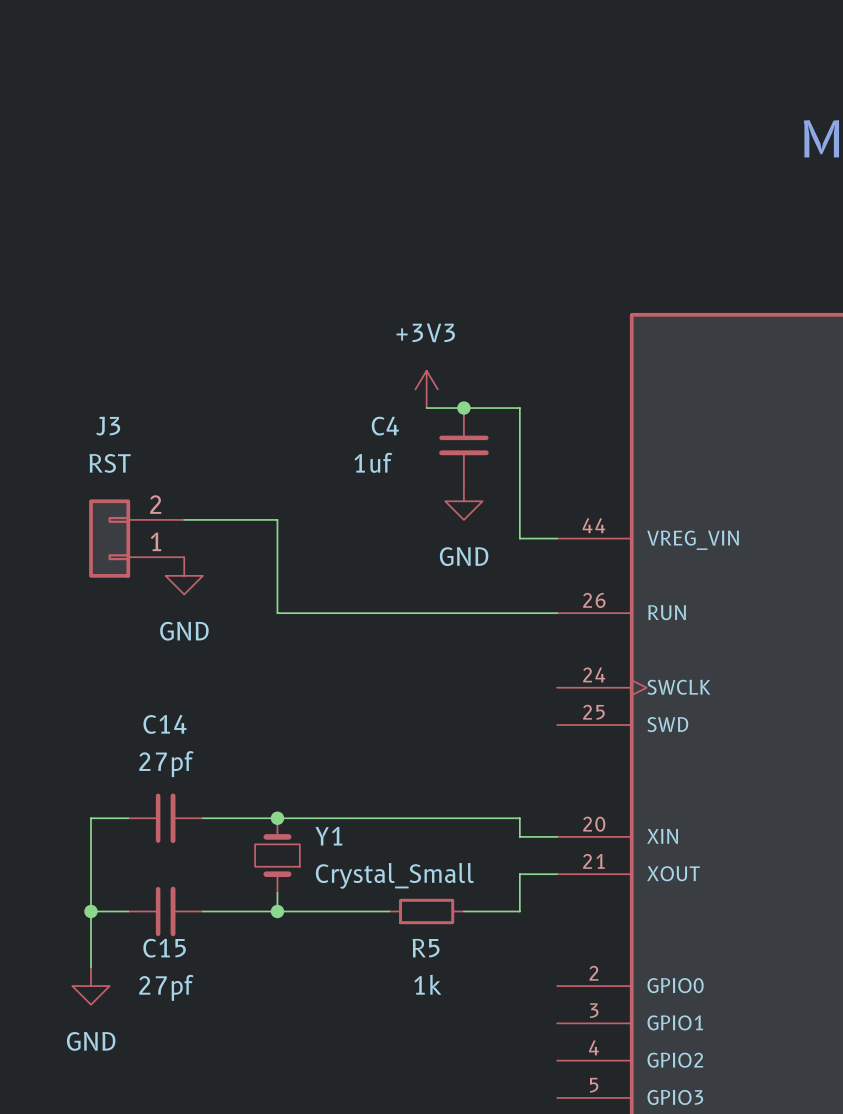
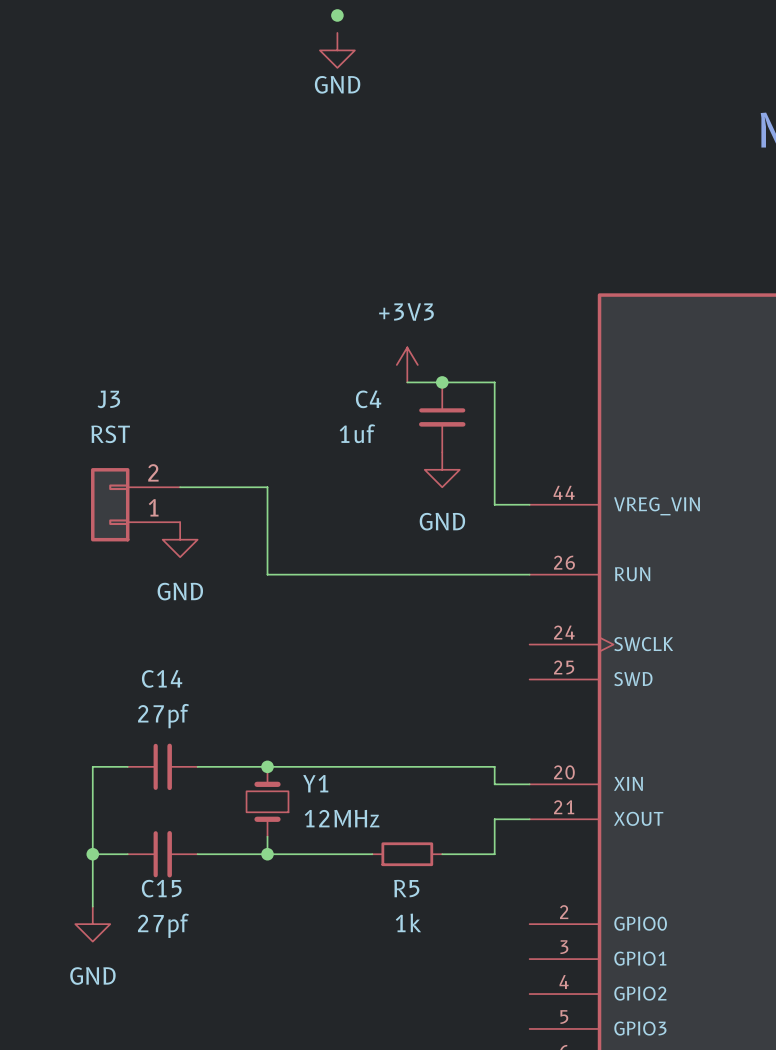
junction: none -> (337, 15)
power symbol: none -> GND (337, 50)
Y1 value: Crystal_Small (394, 875) -> 12MHz (342, 818)

